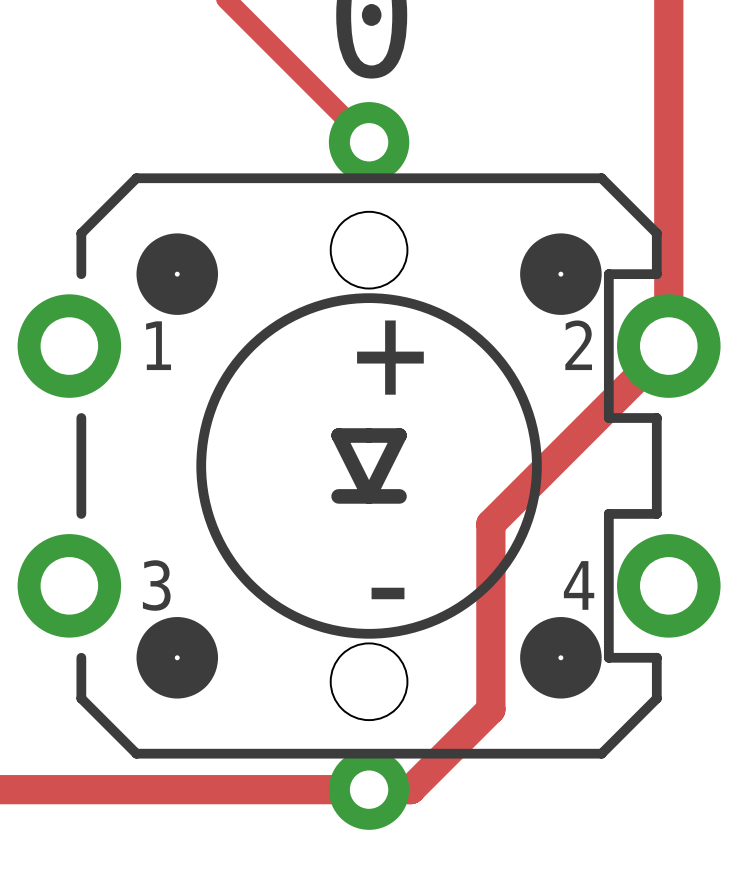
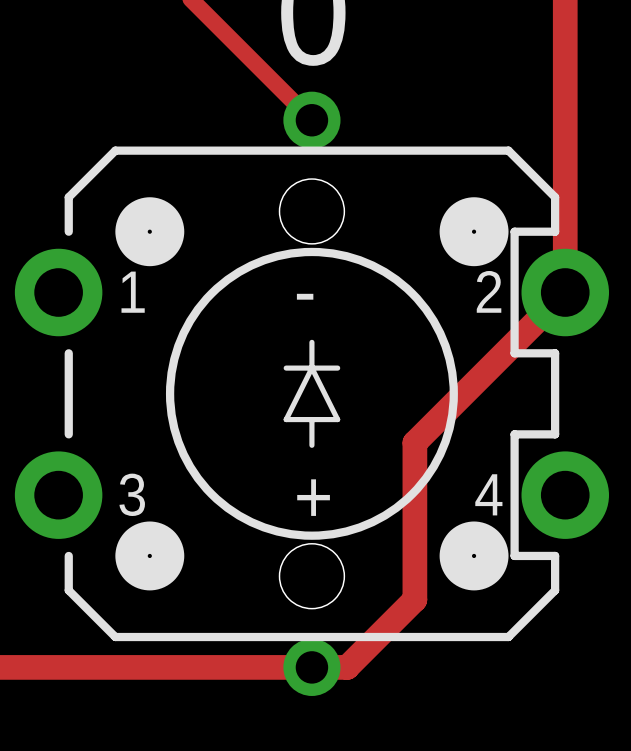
part footprint: [17, 102, 721, 830] -> [14, 91, 610, 696]

